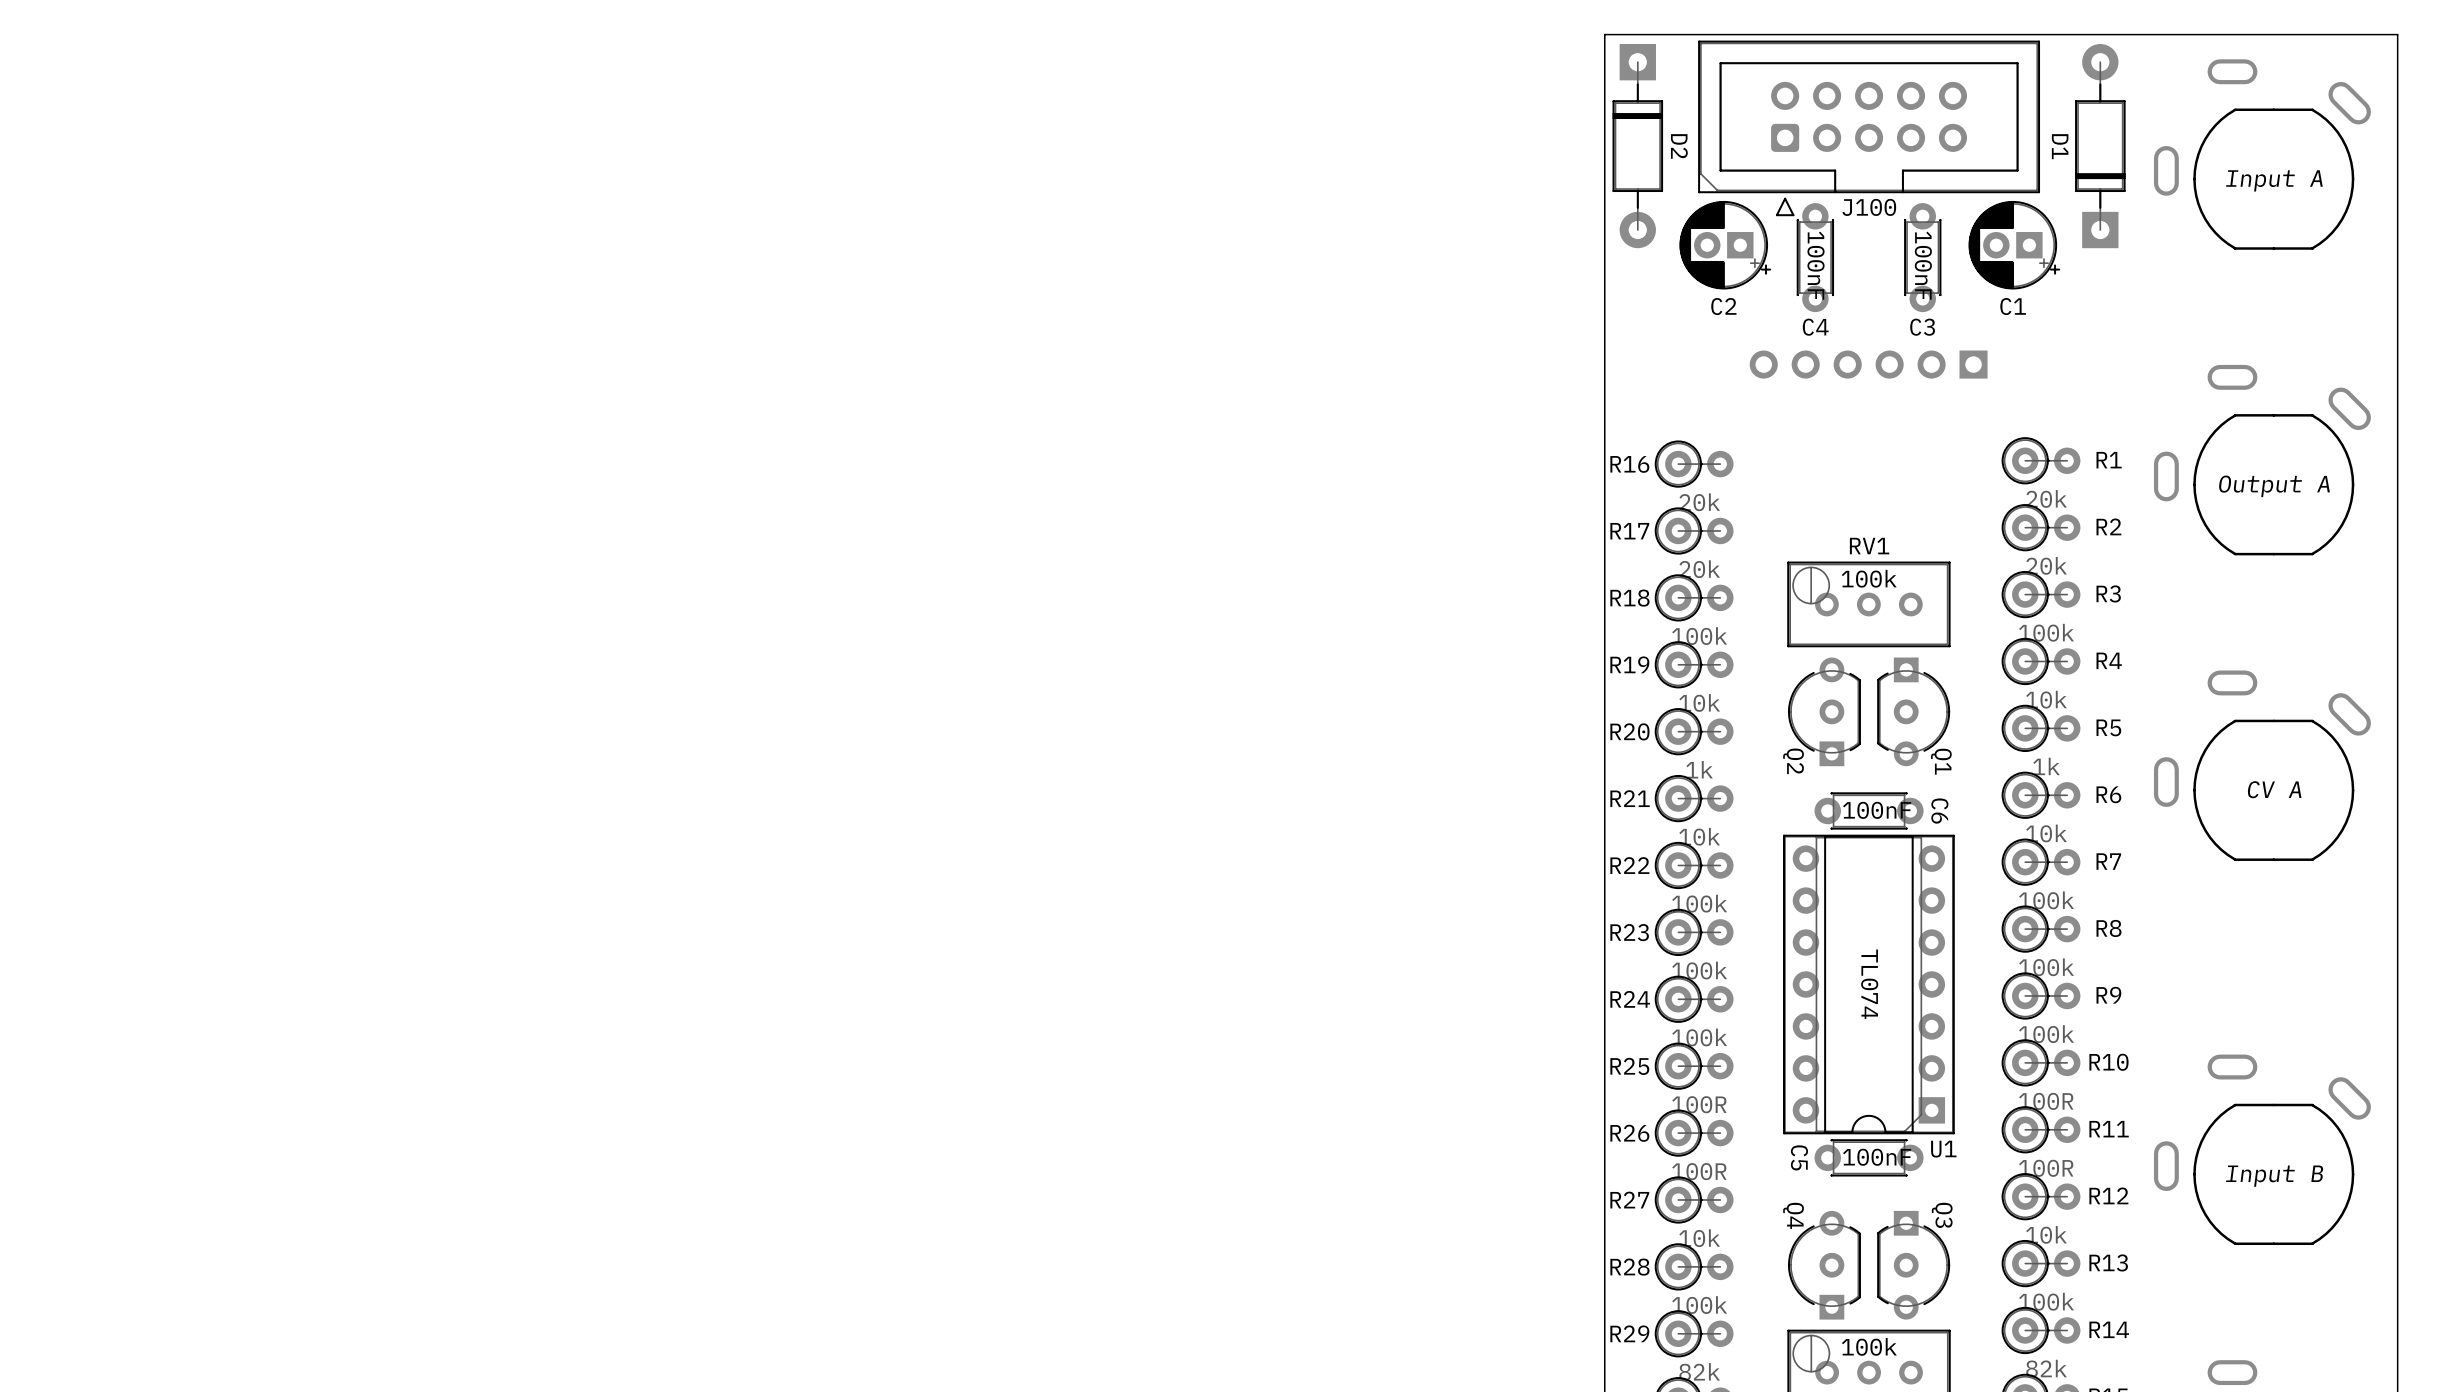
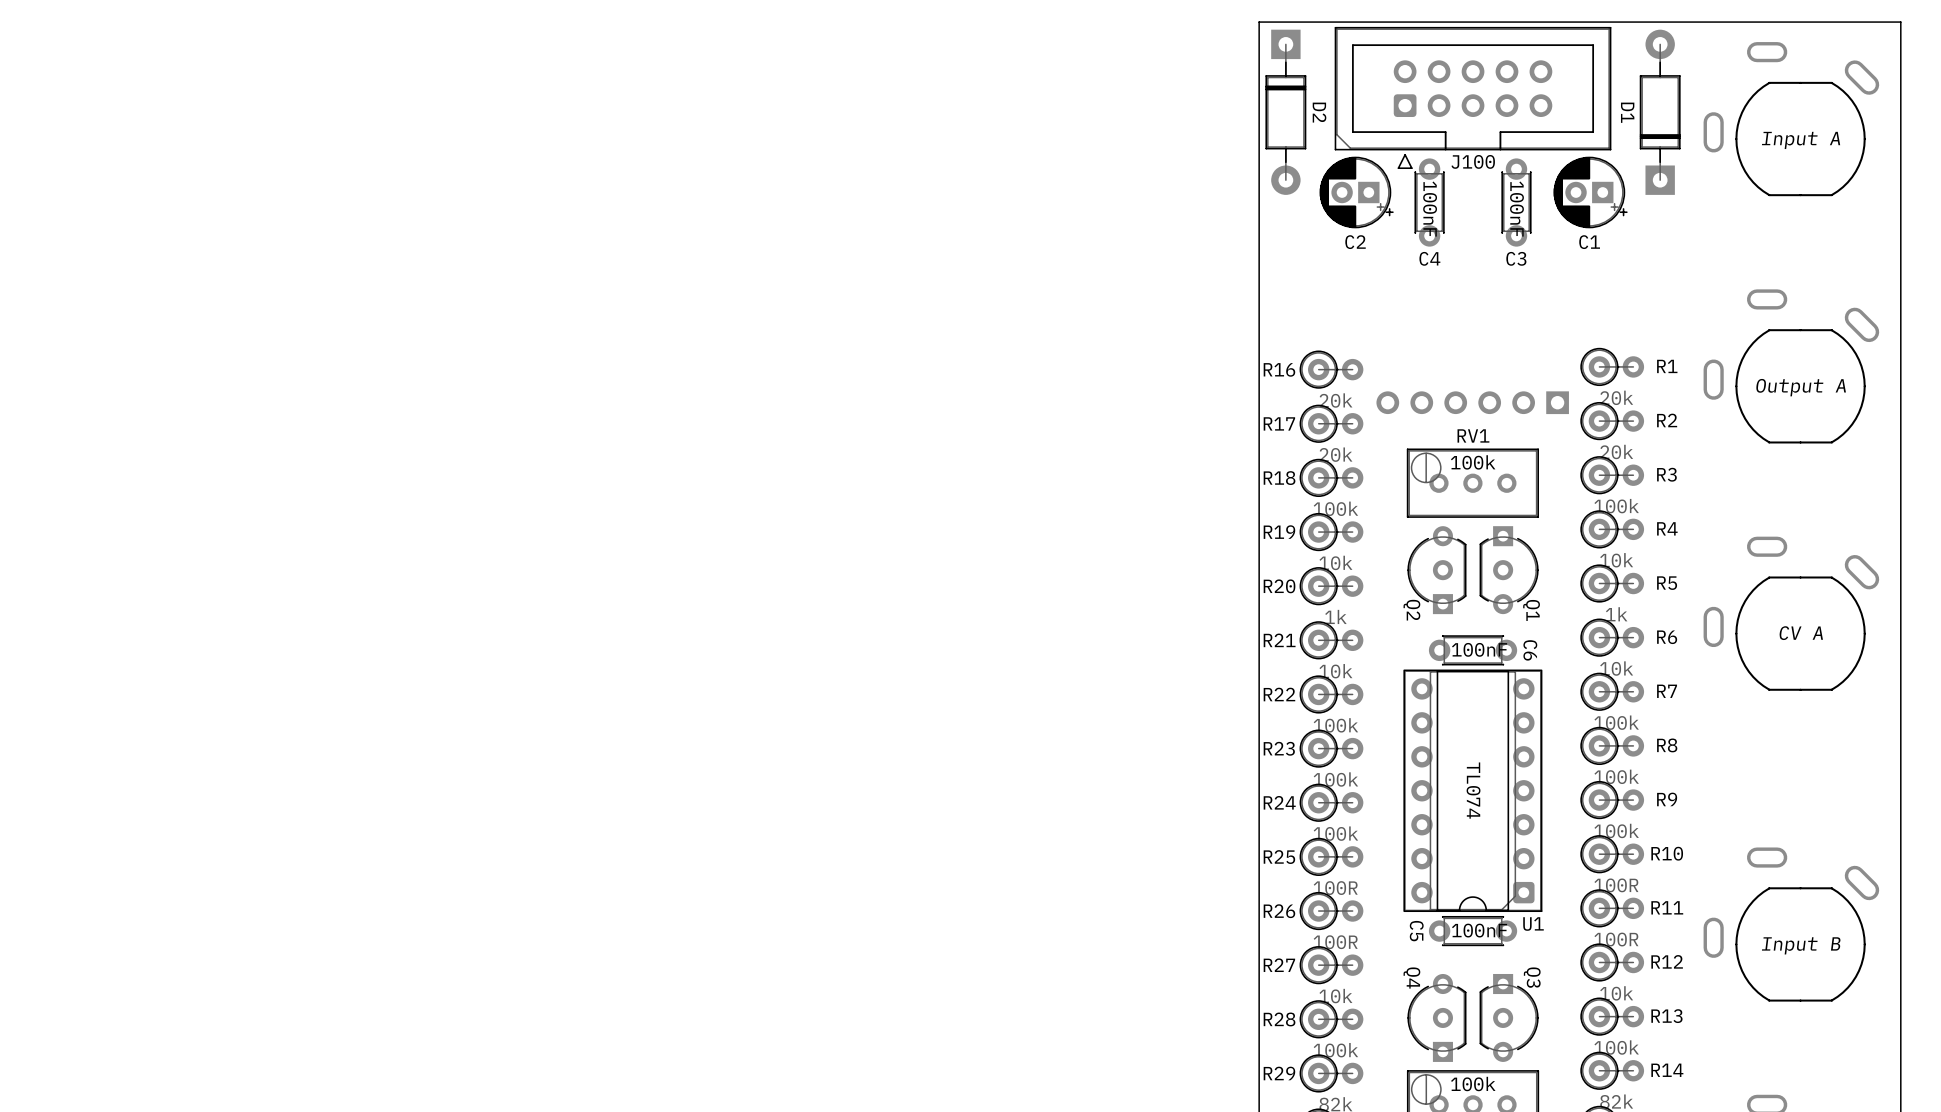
part position: (1868, 364) -> (1472, 402)
U1 footprint: [1783, 834, 1955, 1135] -> [1403, 669, 1543, 913]

